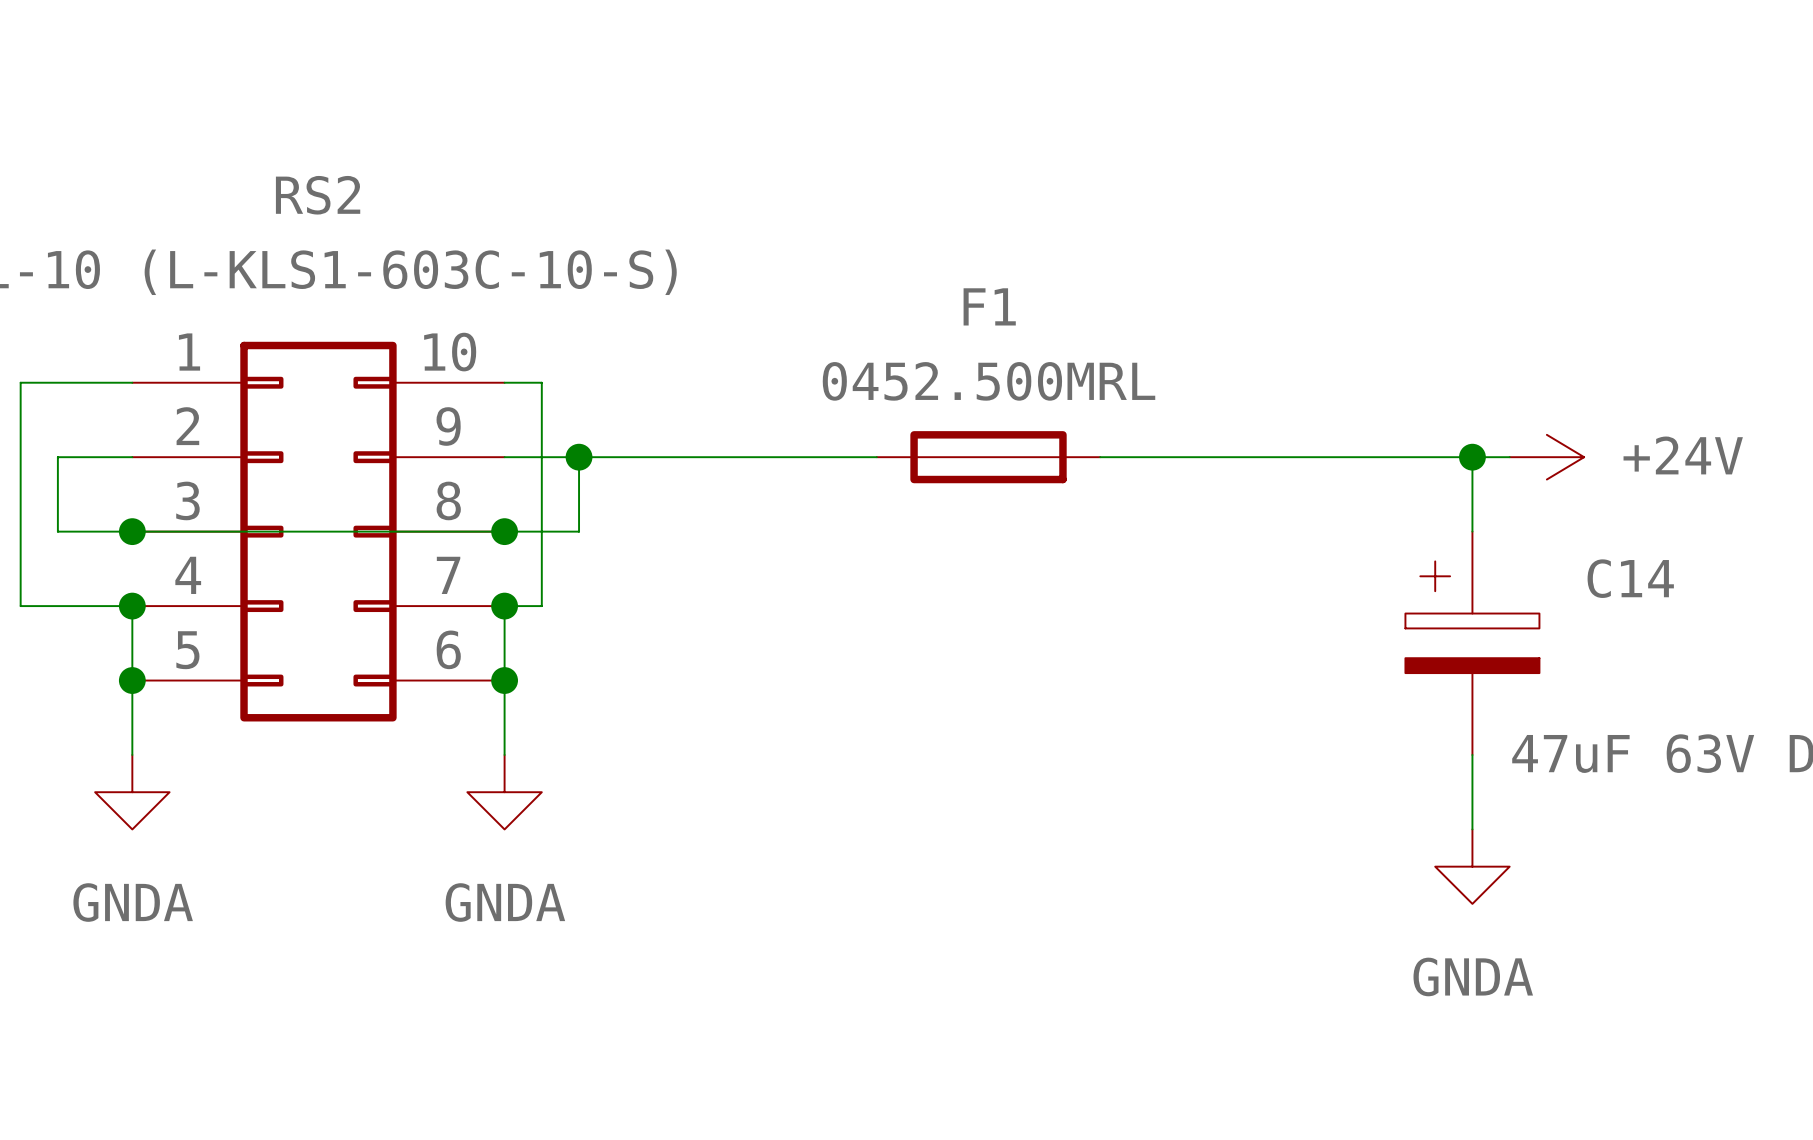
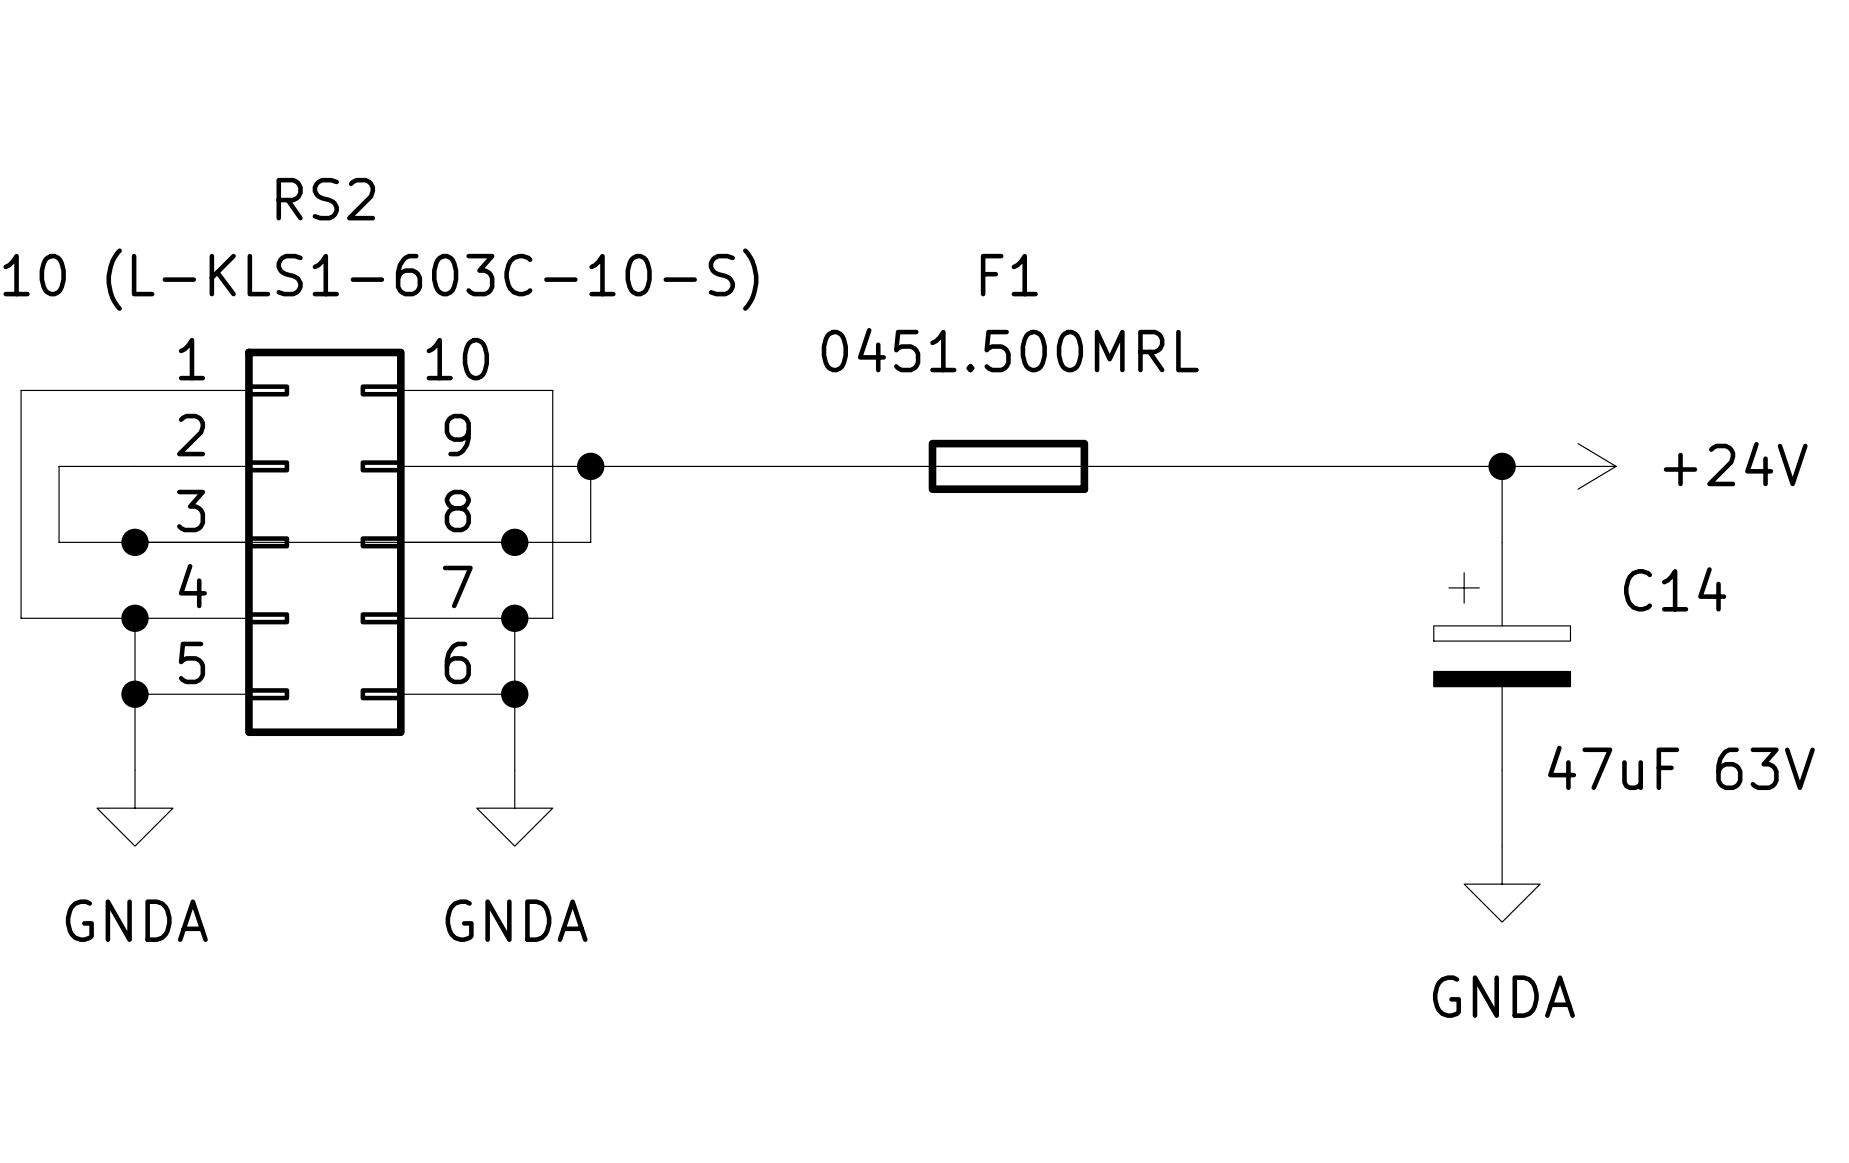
F1 name position: F1 (989, 306) -> F1 (1009, 275)
F1 value: 0452.500MRL (989, 381) -> 0451.500MRL (1010, 350)

